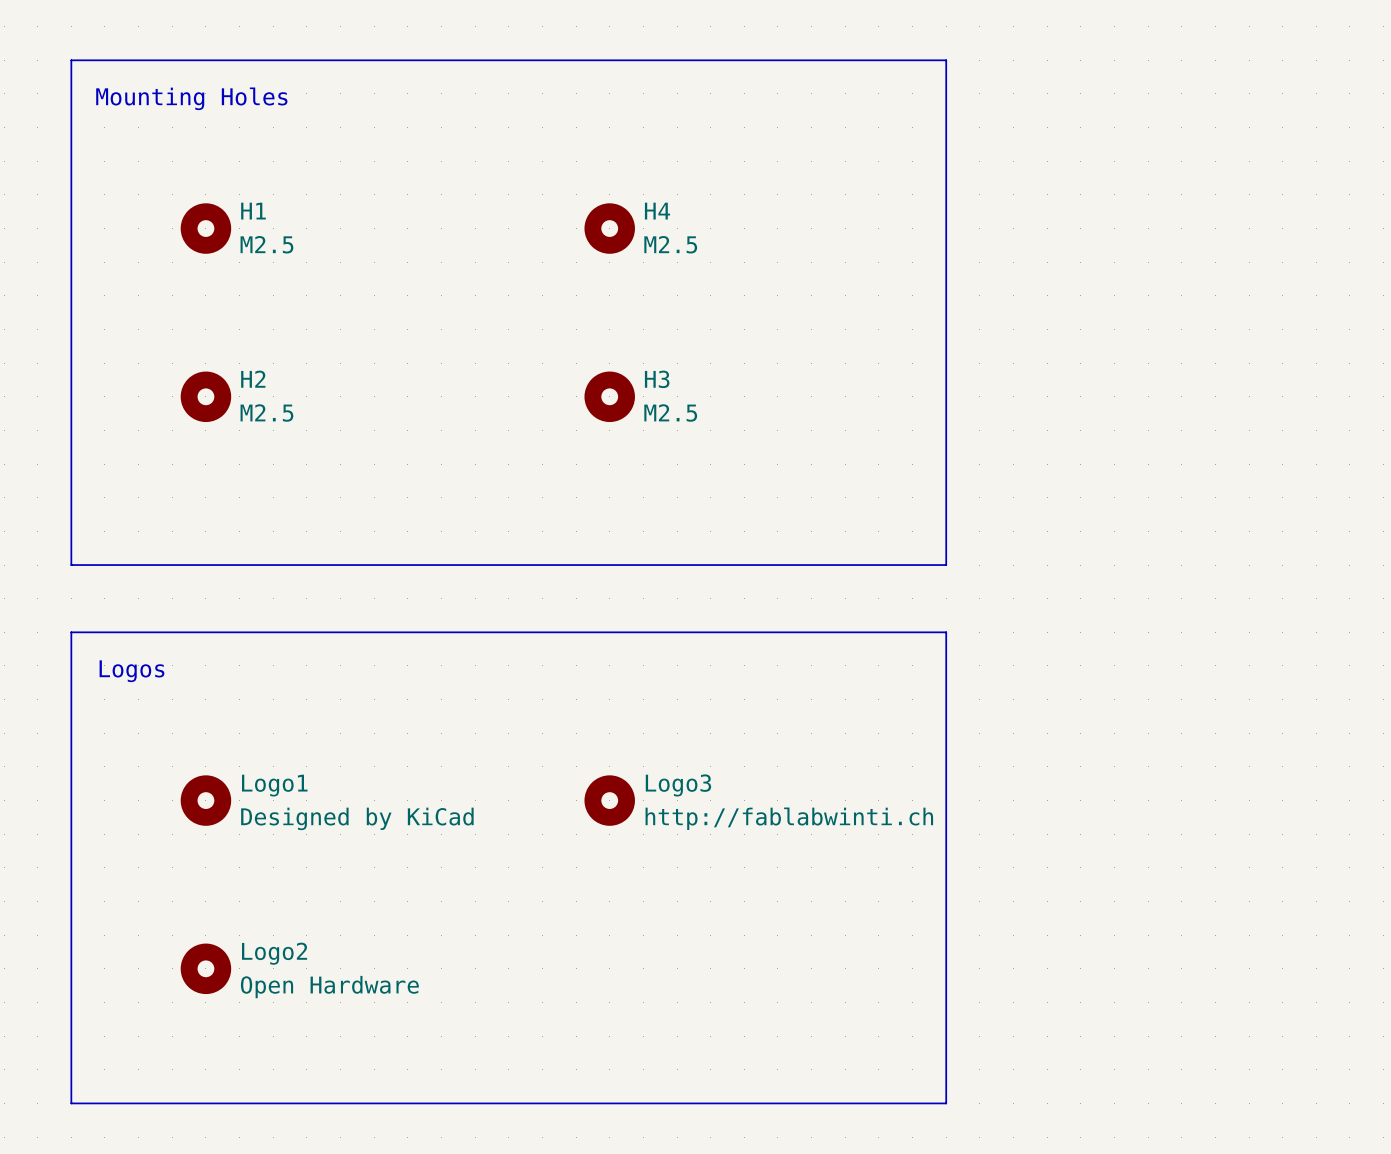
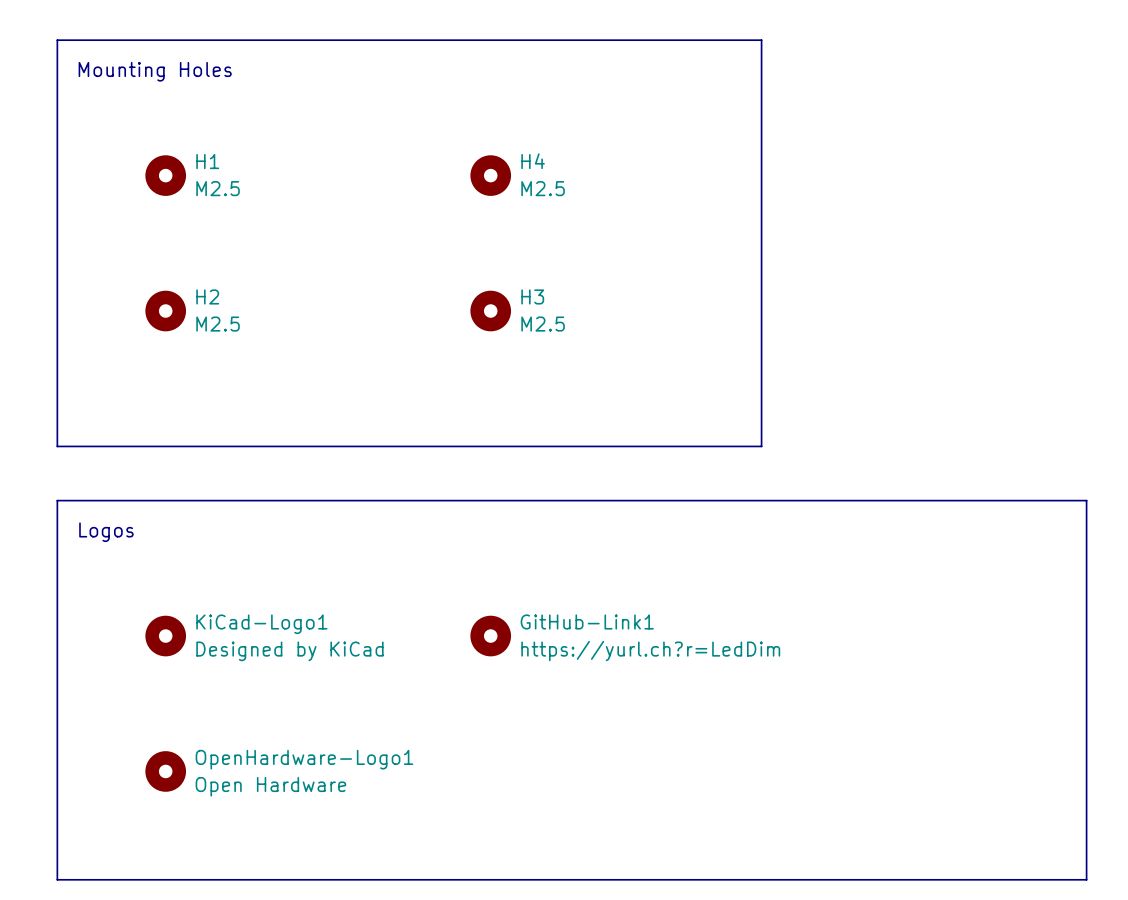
line: (946, 632) (946, 1103) -> (761, 500) (1086, 500) (1086, 879) (761, 879)
Logo1 name: Logo1 (274, 785) -> KiCad-Logo1 (261, 624)
Logo3 name: Logo3 (678, 785) -> GitHub-Link1 (587, 621)
Logo3 value: http://fablabwinti.ch (789, 818) -> https://yurl.ch?r=LedDim (650, 651)
Logo2 name: Logo2 (274, 953) -> OpenHardware-Logo1 (304, 759)

